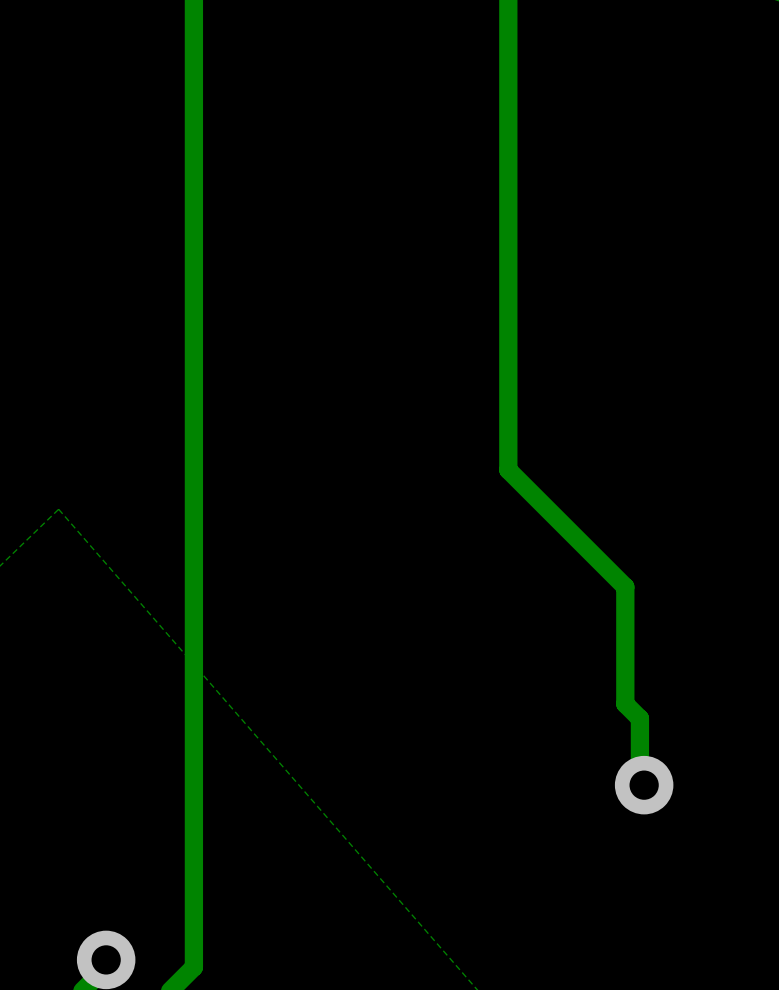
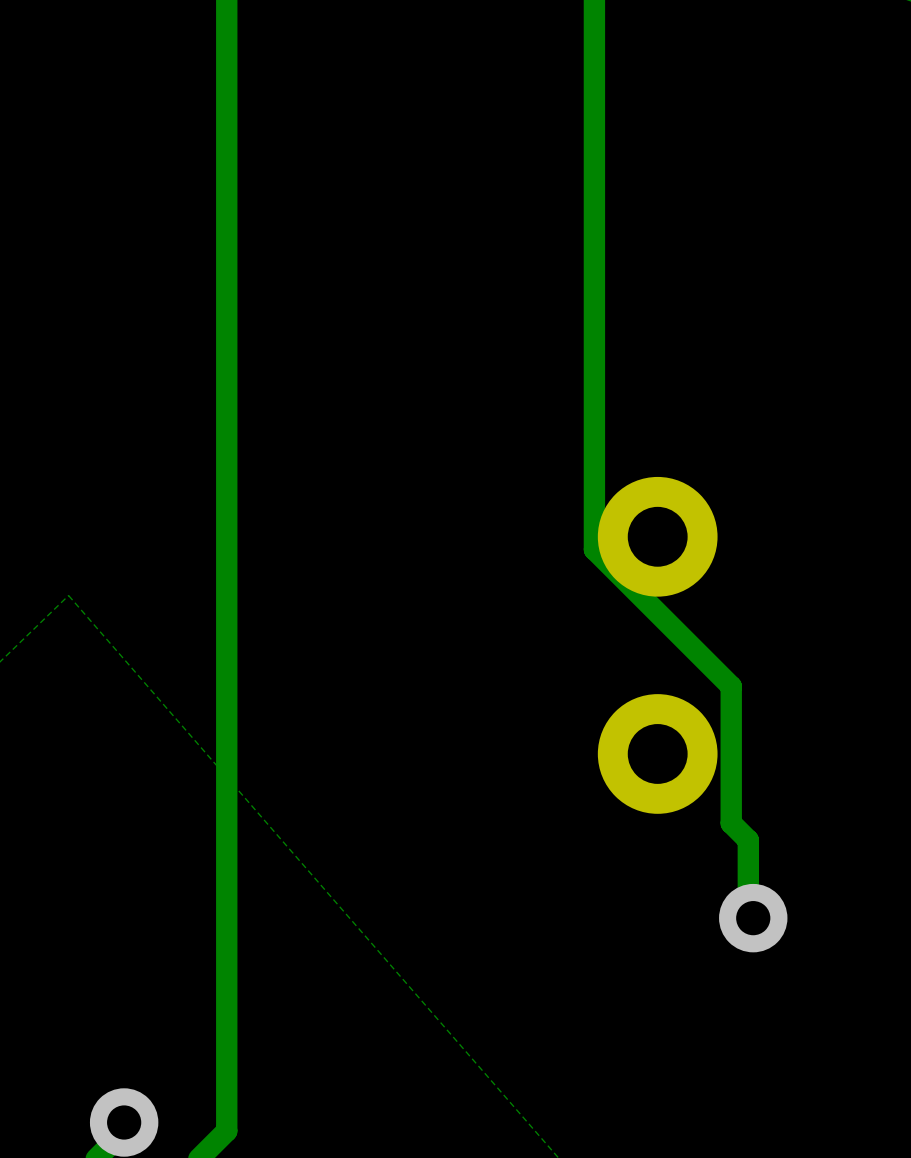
part: none -> (657, 645)

